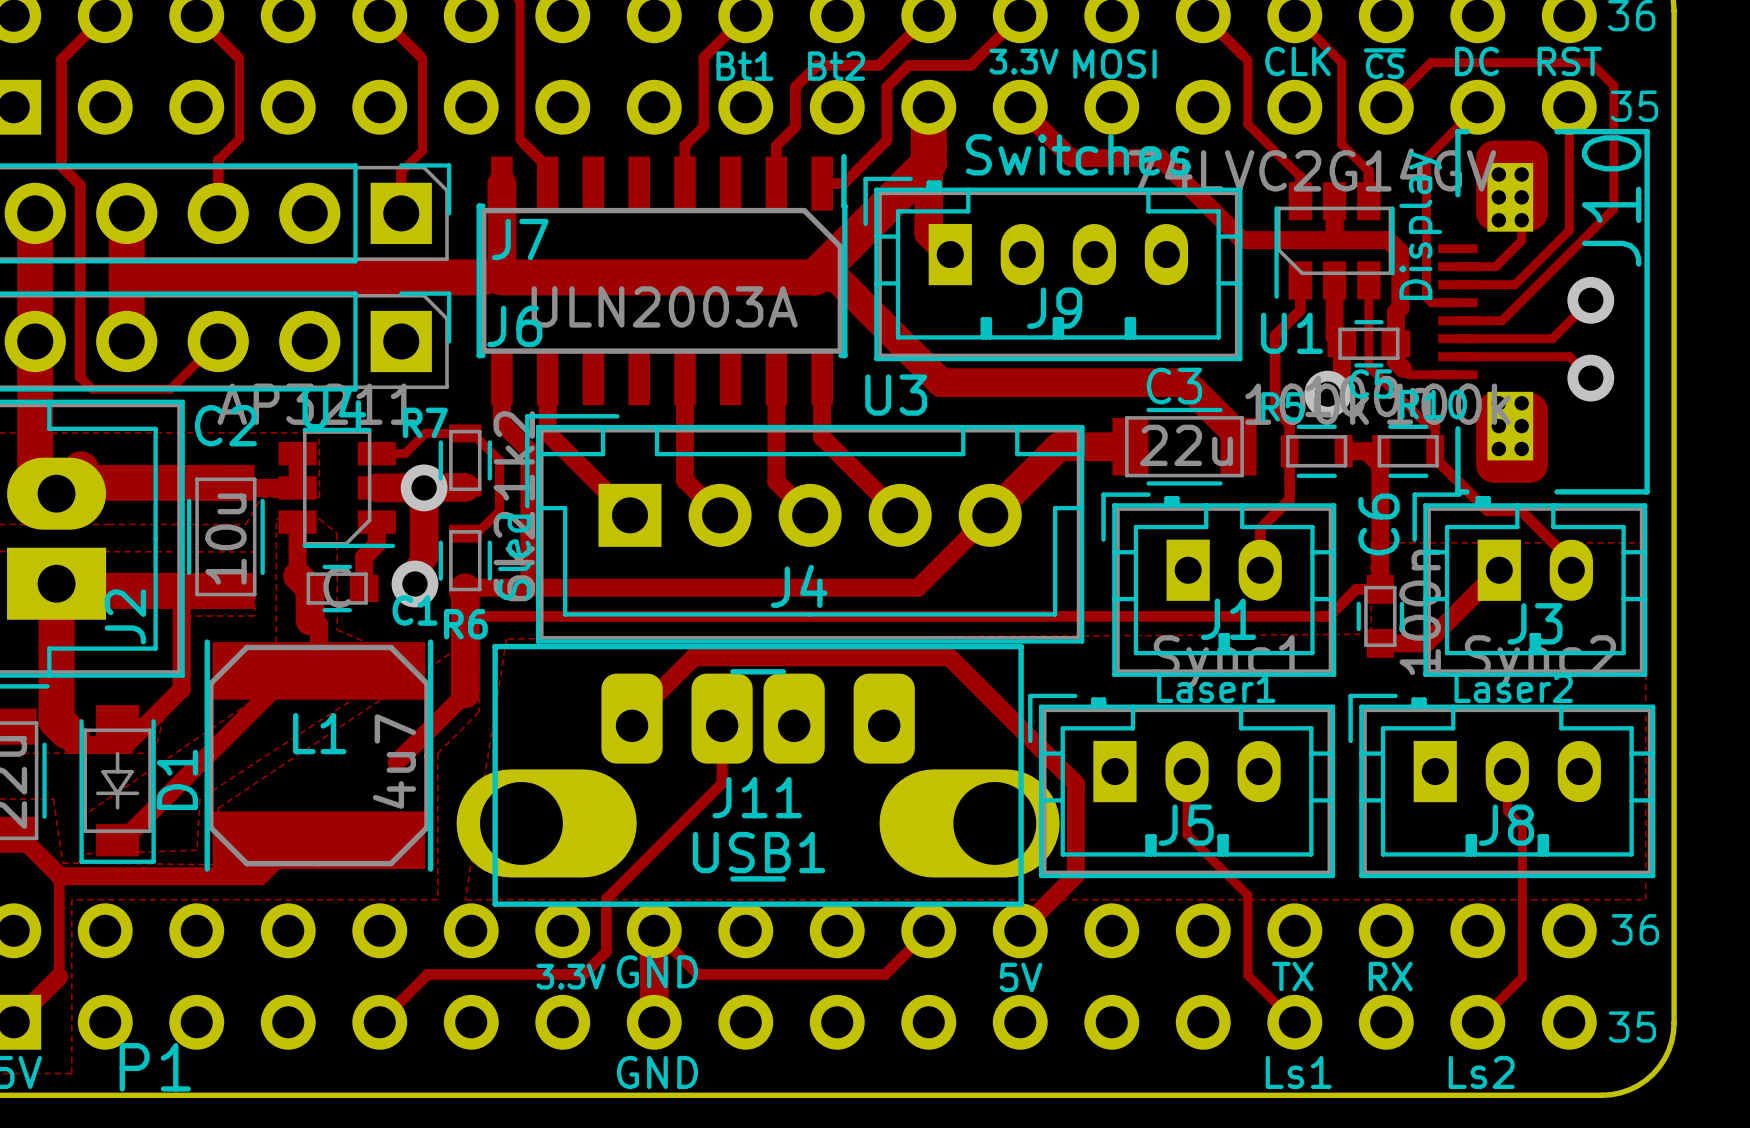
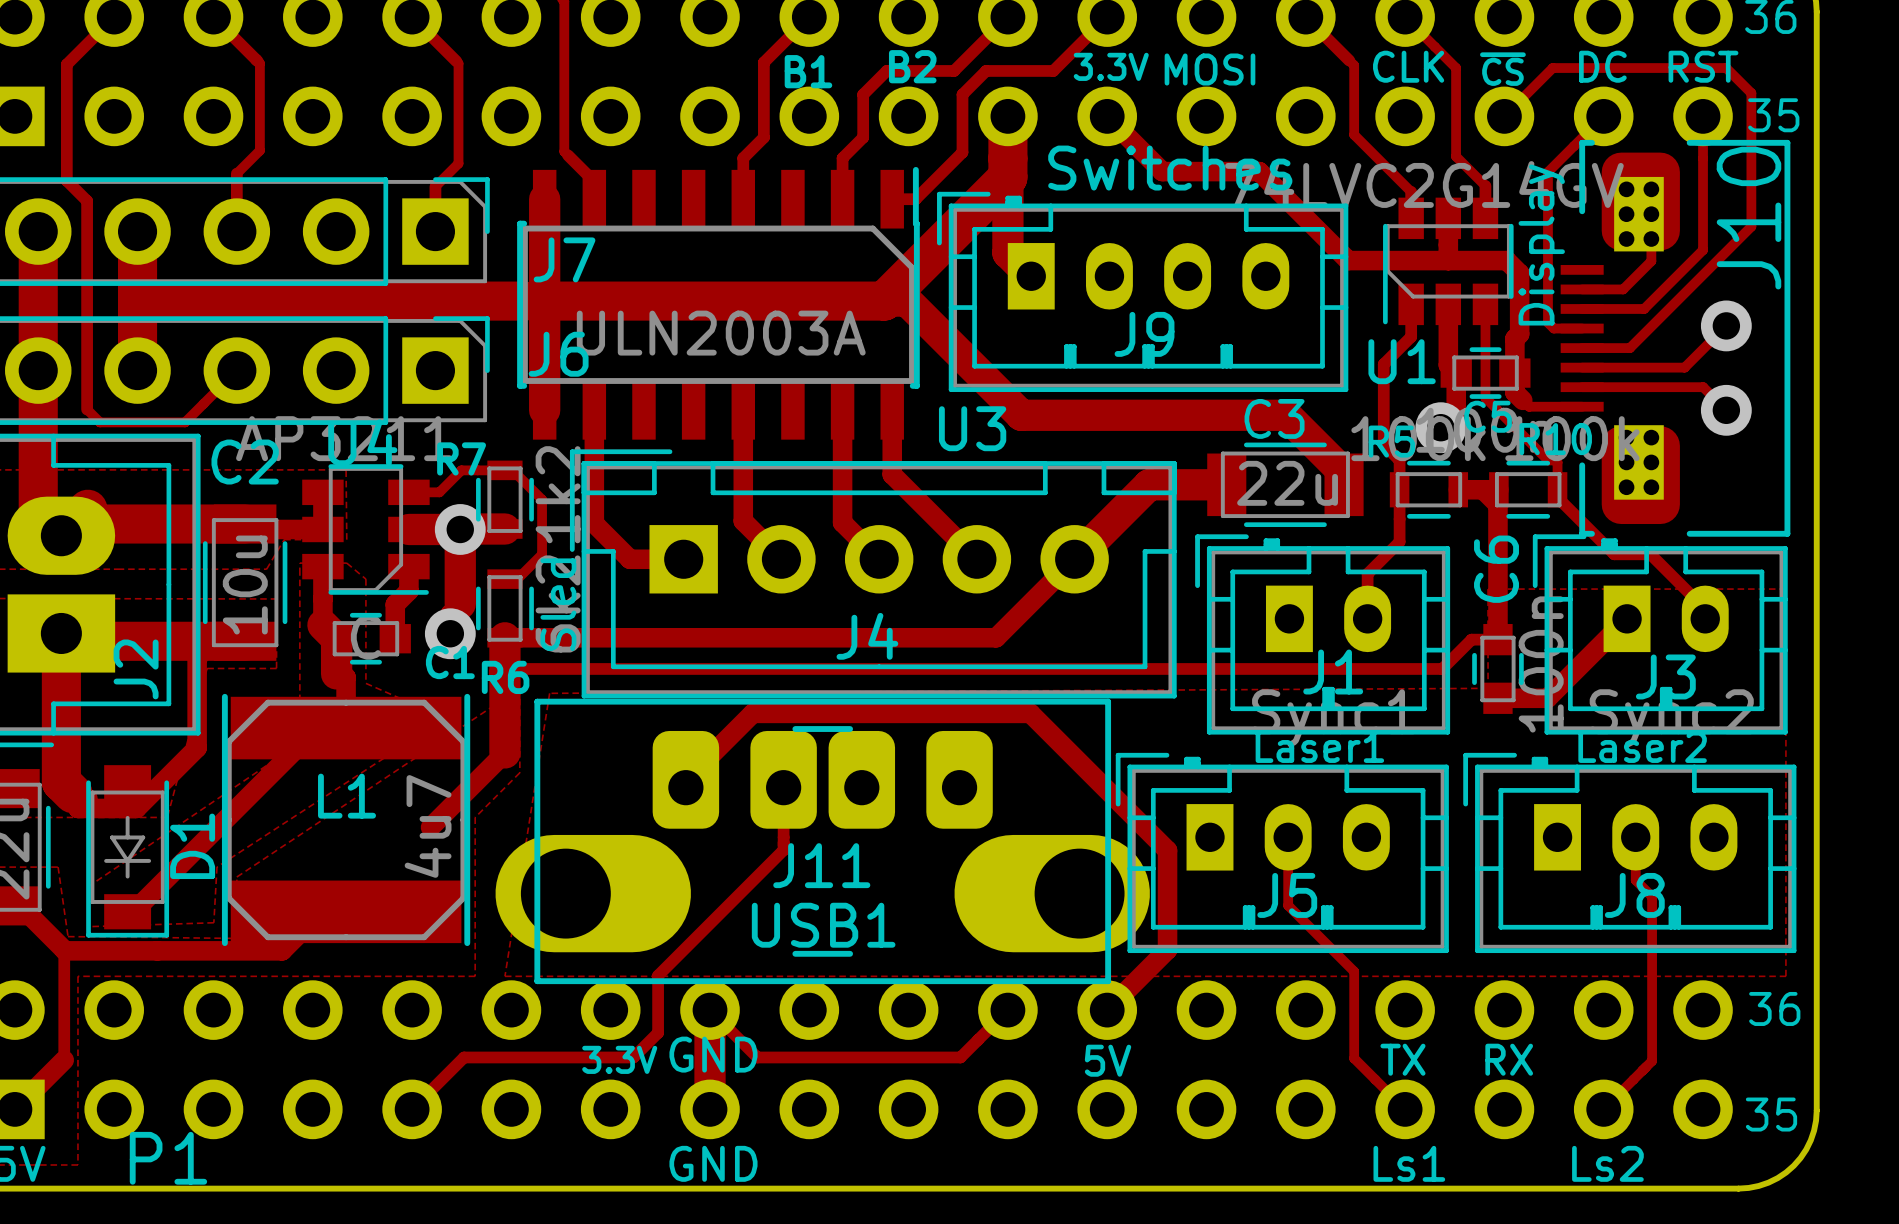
text: Bt1 (745, 66) -> B1 (808, 71)
text: Bt2 (836, 66) -> B2 (912, 66)
track: (501, 378) (501, 423) (529, 450) (529, 587) -> (544, 410) (544, 301)
track: (547, 433) (630, 515) -> (594, 469) (594, 523) (629, 559) (683, 559)

